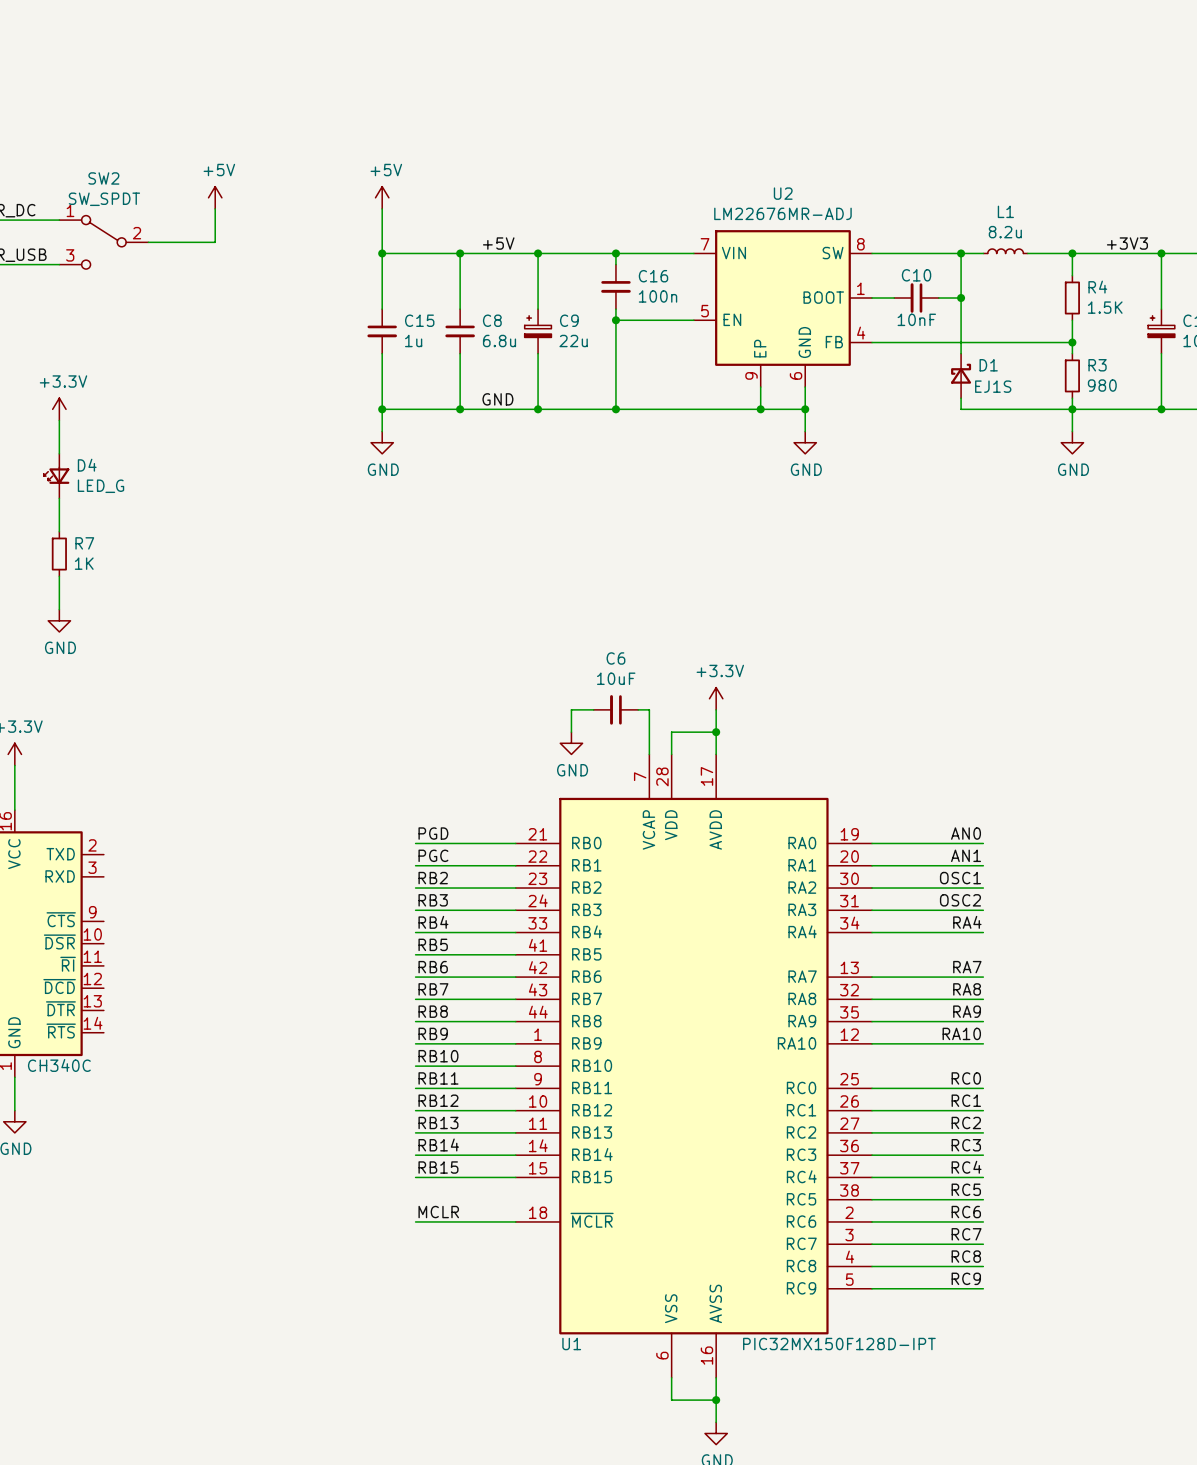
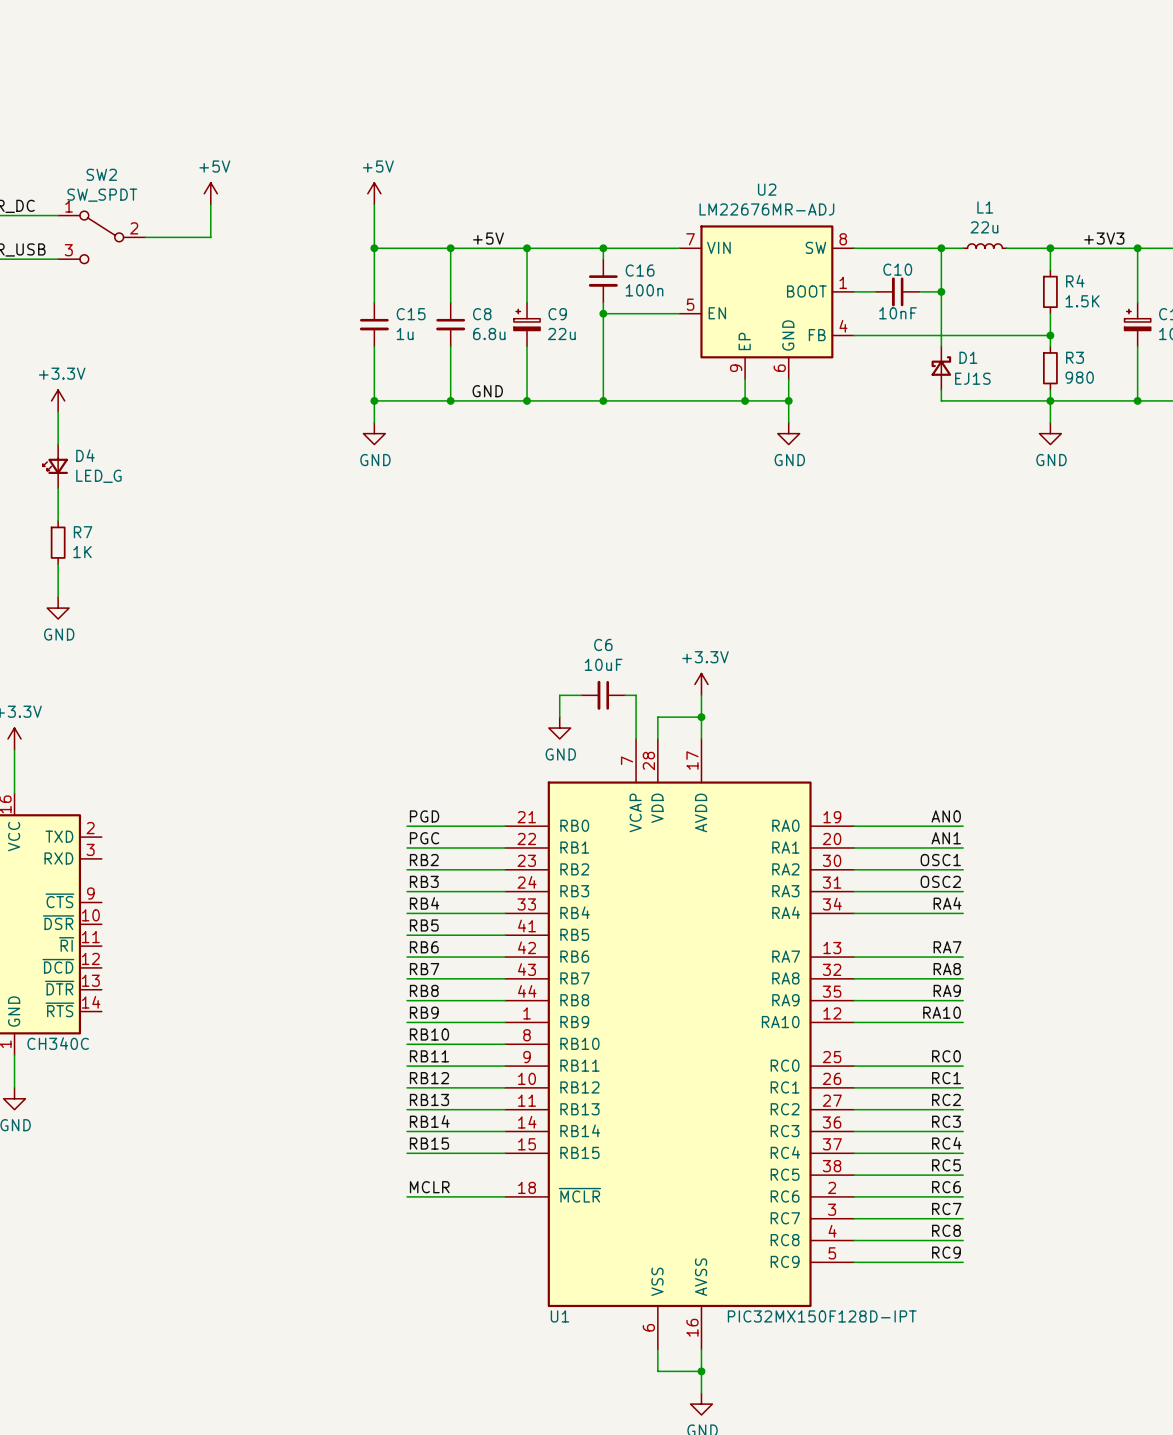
L1 value: 8.2u (1005, 232) -> 22u (984, 227)

